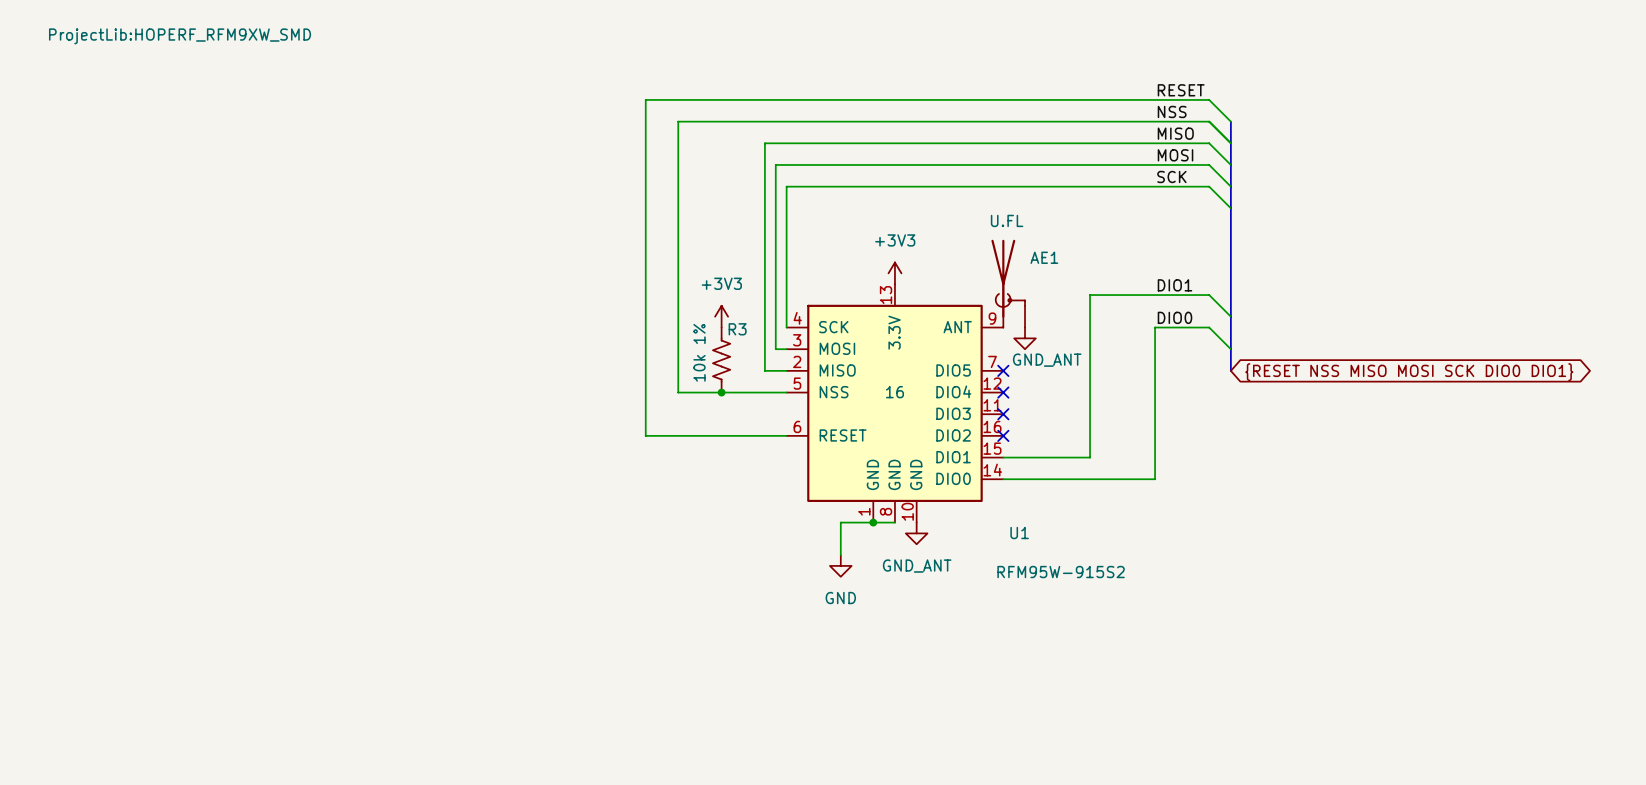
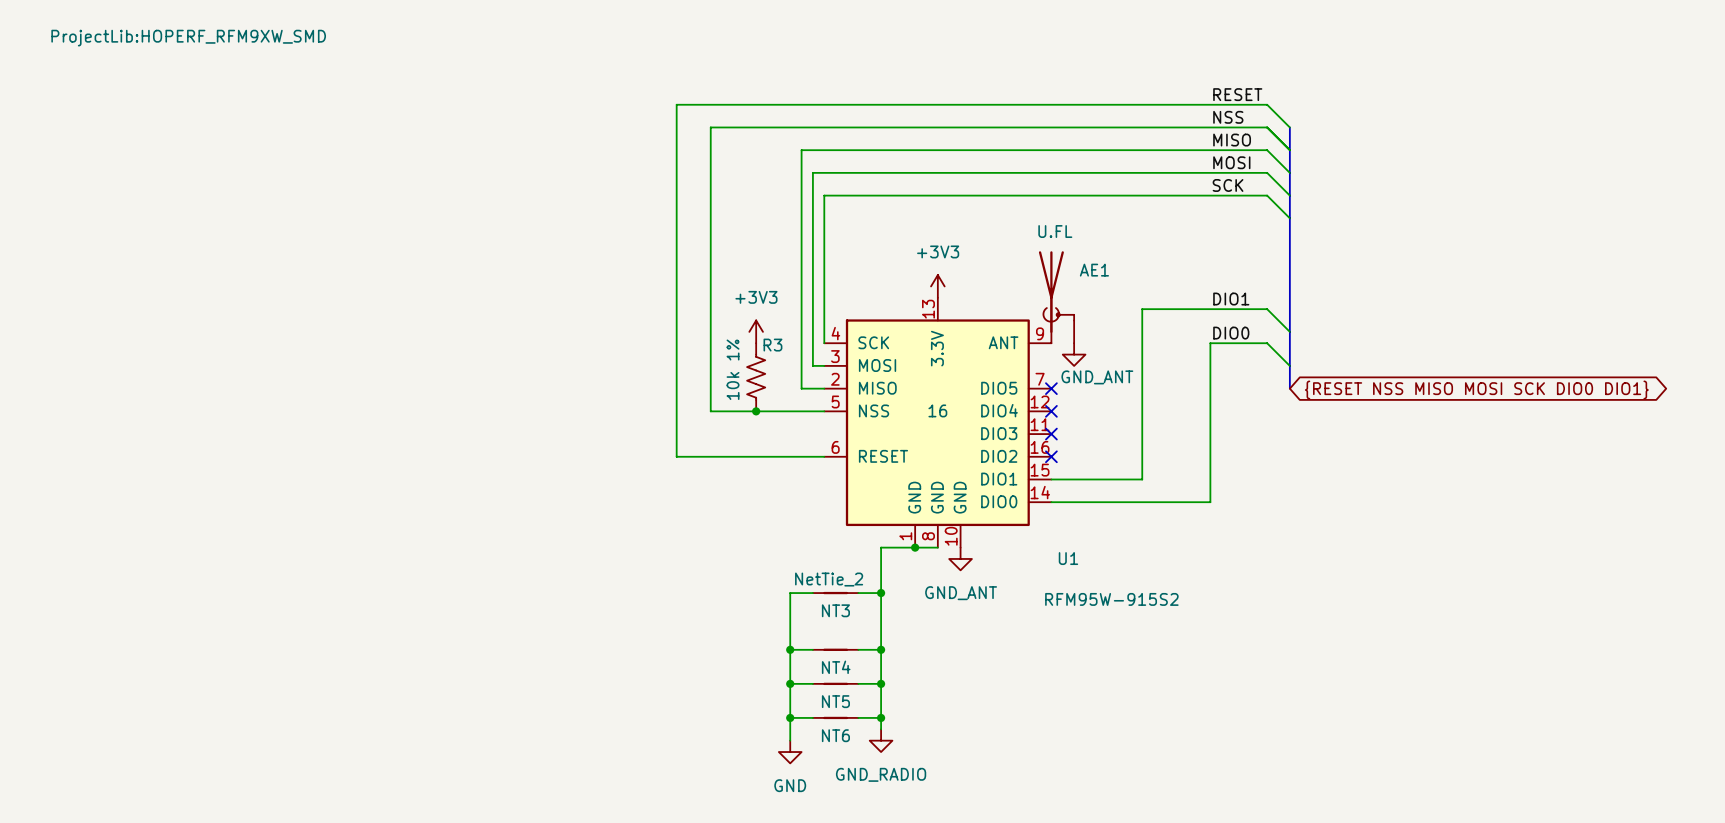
wire: none -> (881, 581) (881, 729)
wire: none -> (812, 593) (790, 593) (790, 740)
NT3: none -> NetTie_2 (835, 593)
wire: none -> (858, 593) (881, 593)
power symbol position: GND (840, 565) -> GND (790, 752)
junction: none -> (881, 593)
wire: none -> (790, 649) (812, 649)
junction: none -> (790, 649)
NT4: none -> (835, 649)
wire: none -> (858, 649) (881, 649)
junction: none -> (881, 649)
wire: none -> (790, 683) (812, 683)
junction: none -> (790, 683)
NT5: none -> (835, 683)
wire: none -> (858, 683) (881, 683)
junction: none -> (881, 683)
wire: none -> (790, 717) (812, 717)
junction: none -> (790, 717)
NT6: none -> (835, 717)
wire: none -> (858, 717) (881, 717)
junction: none -> (881, 717)
power symbol: none -> GND_RADIO (881, 740)

